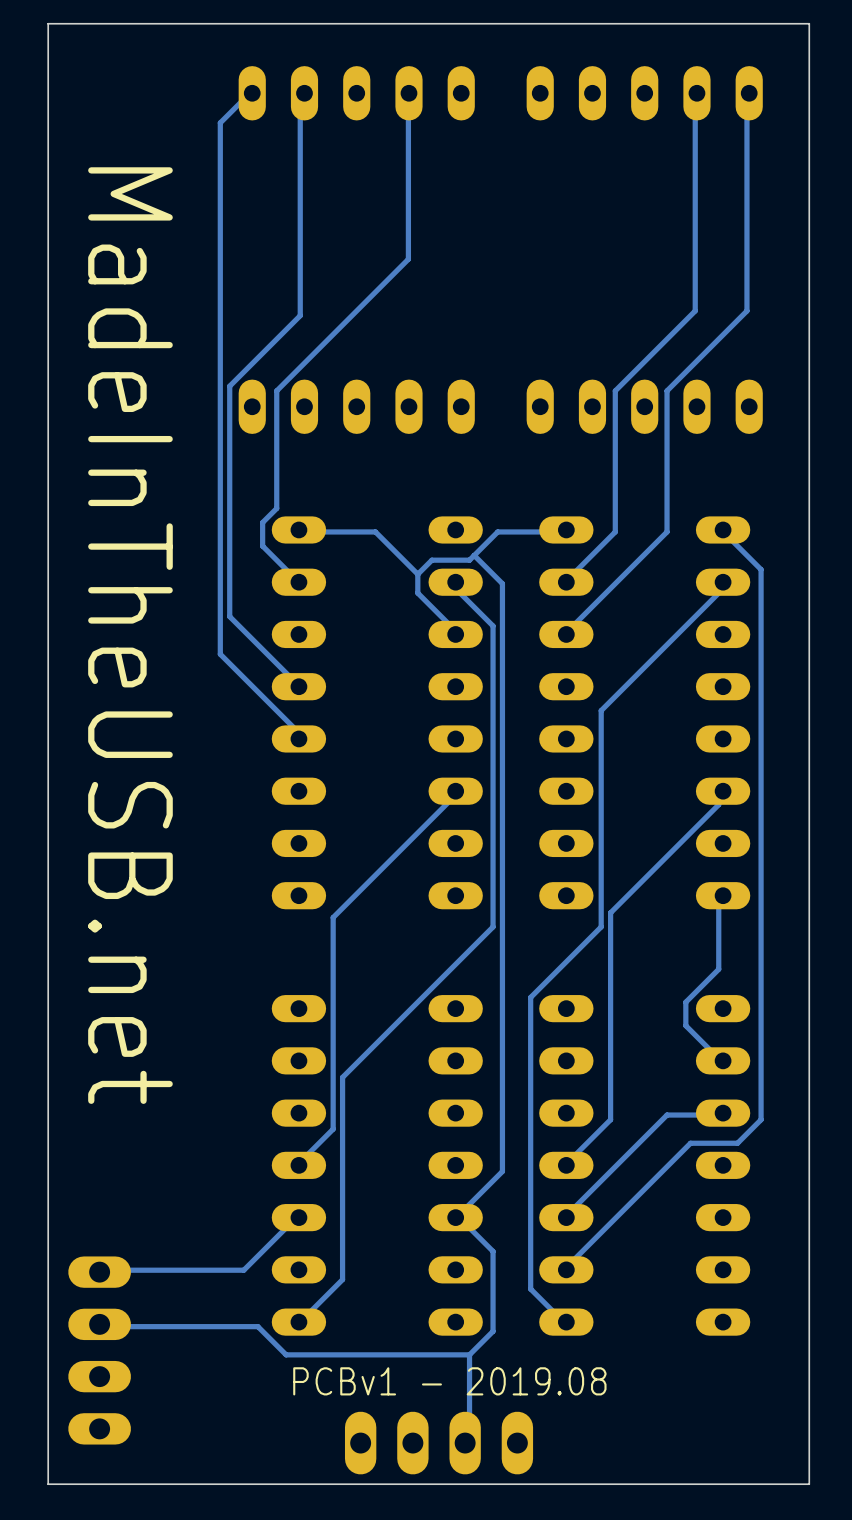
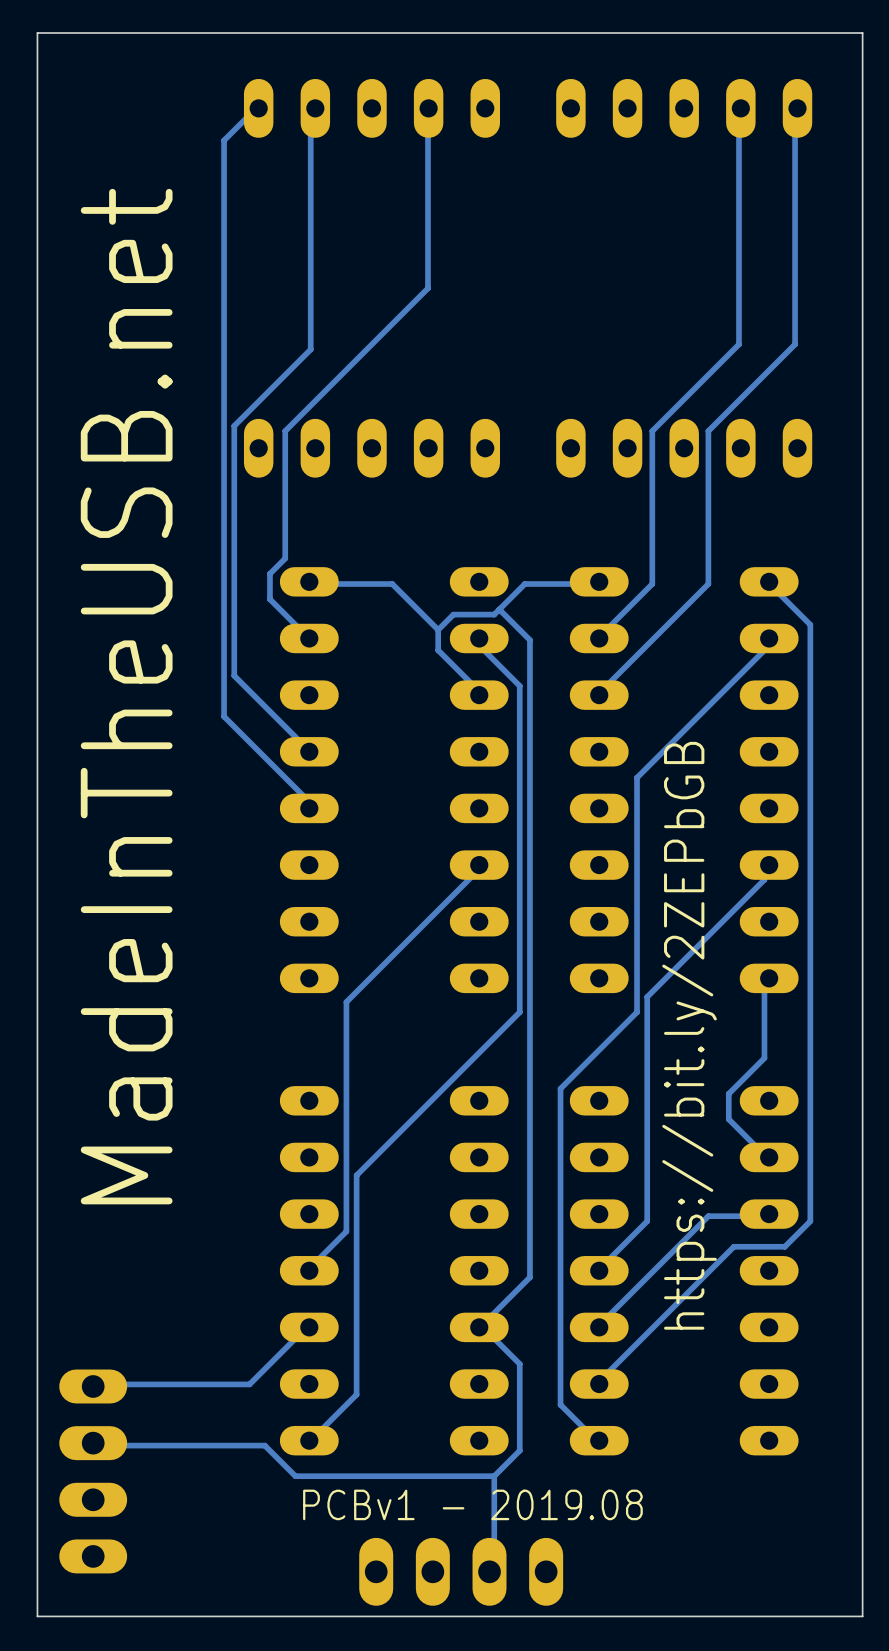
text rotation: 0° (130, 635) -> 180° (126, 696)
text: none -> https://bit.ly/2ZEPbGB (689, 1035)

